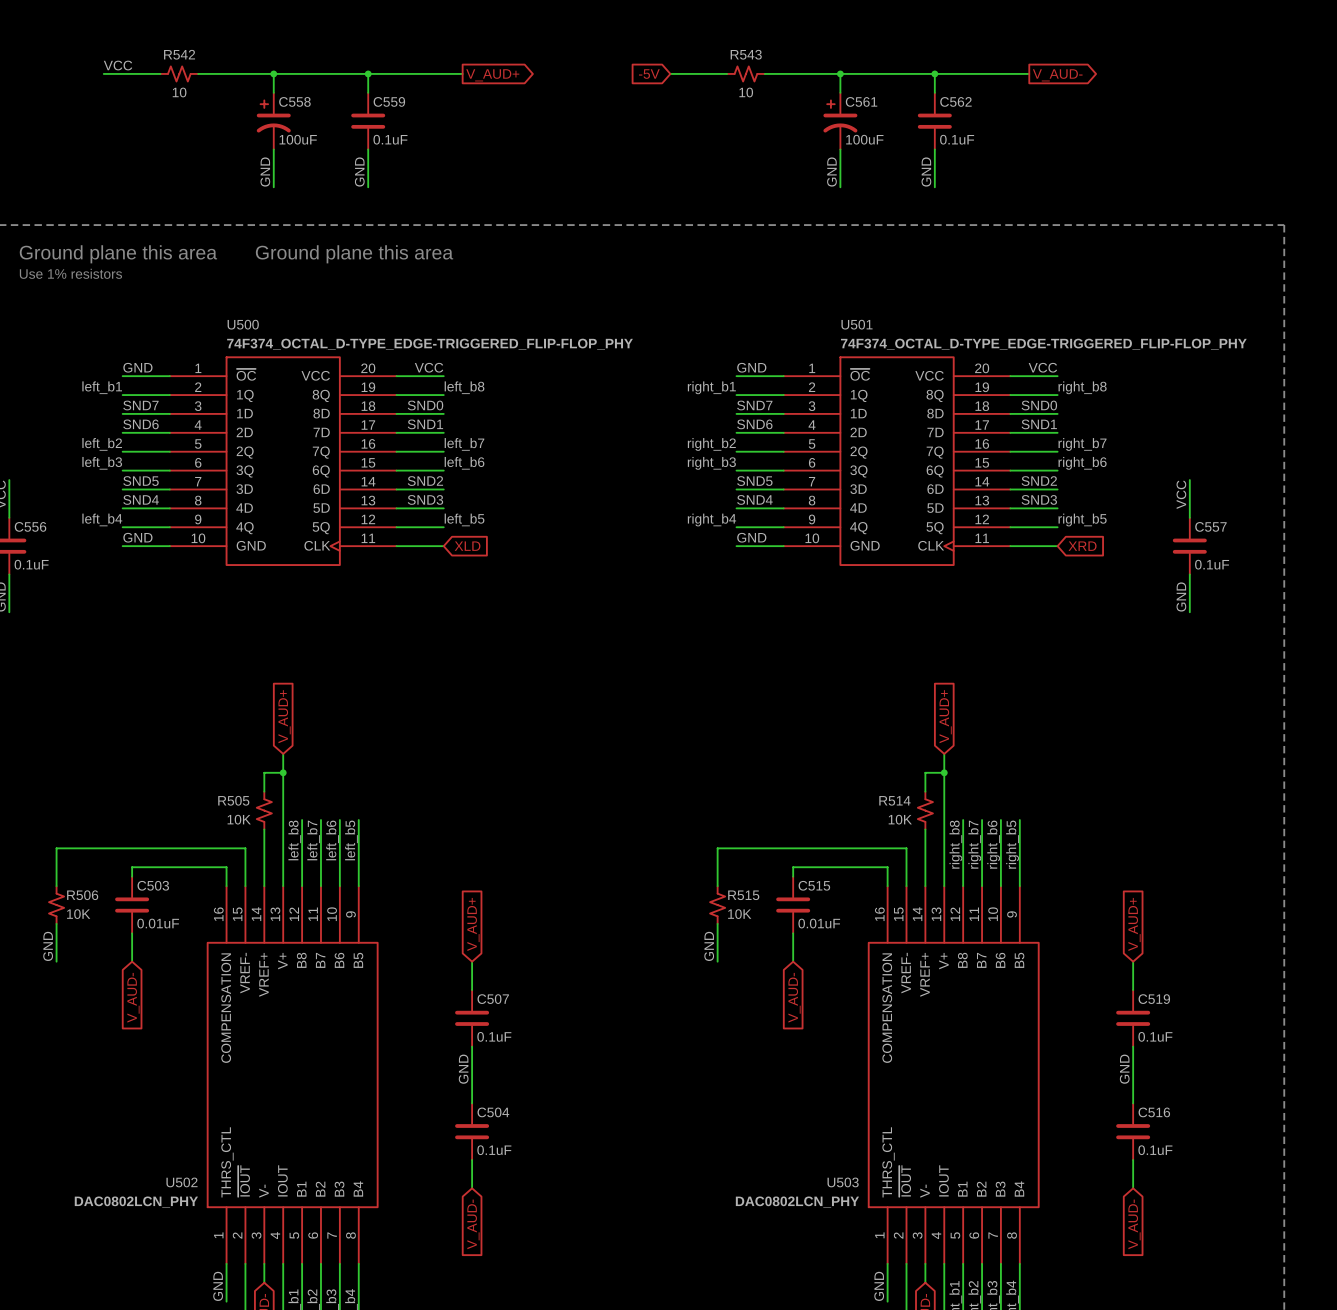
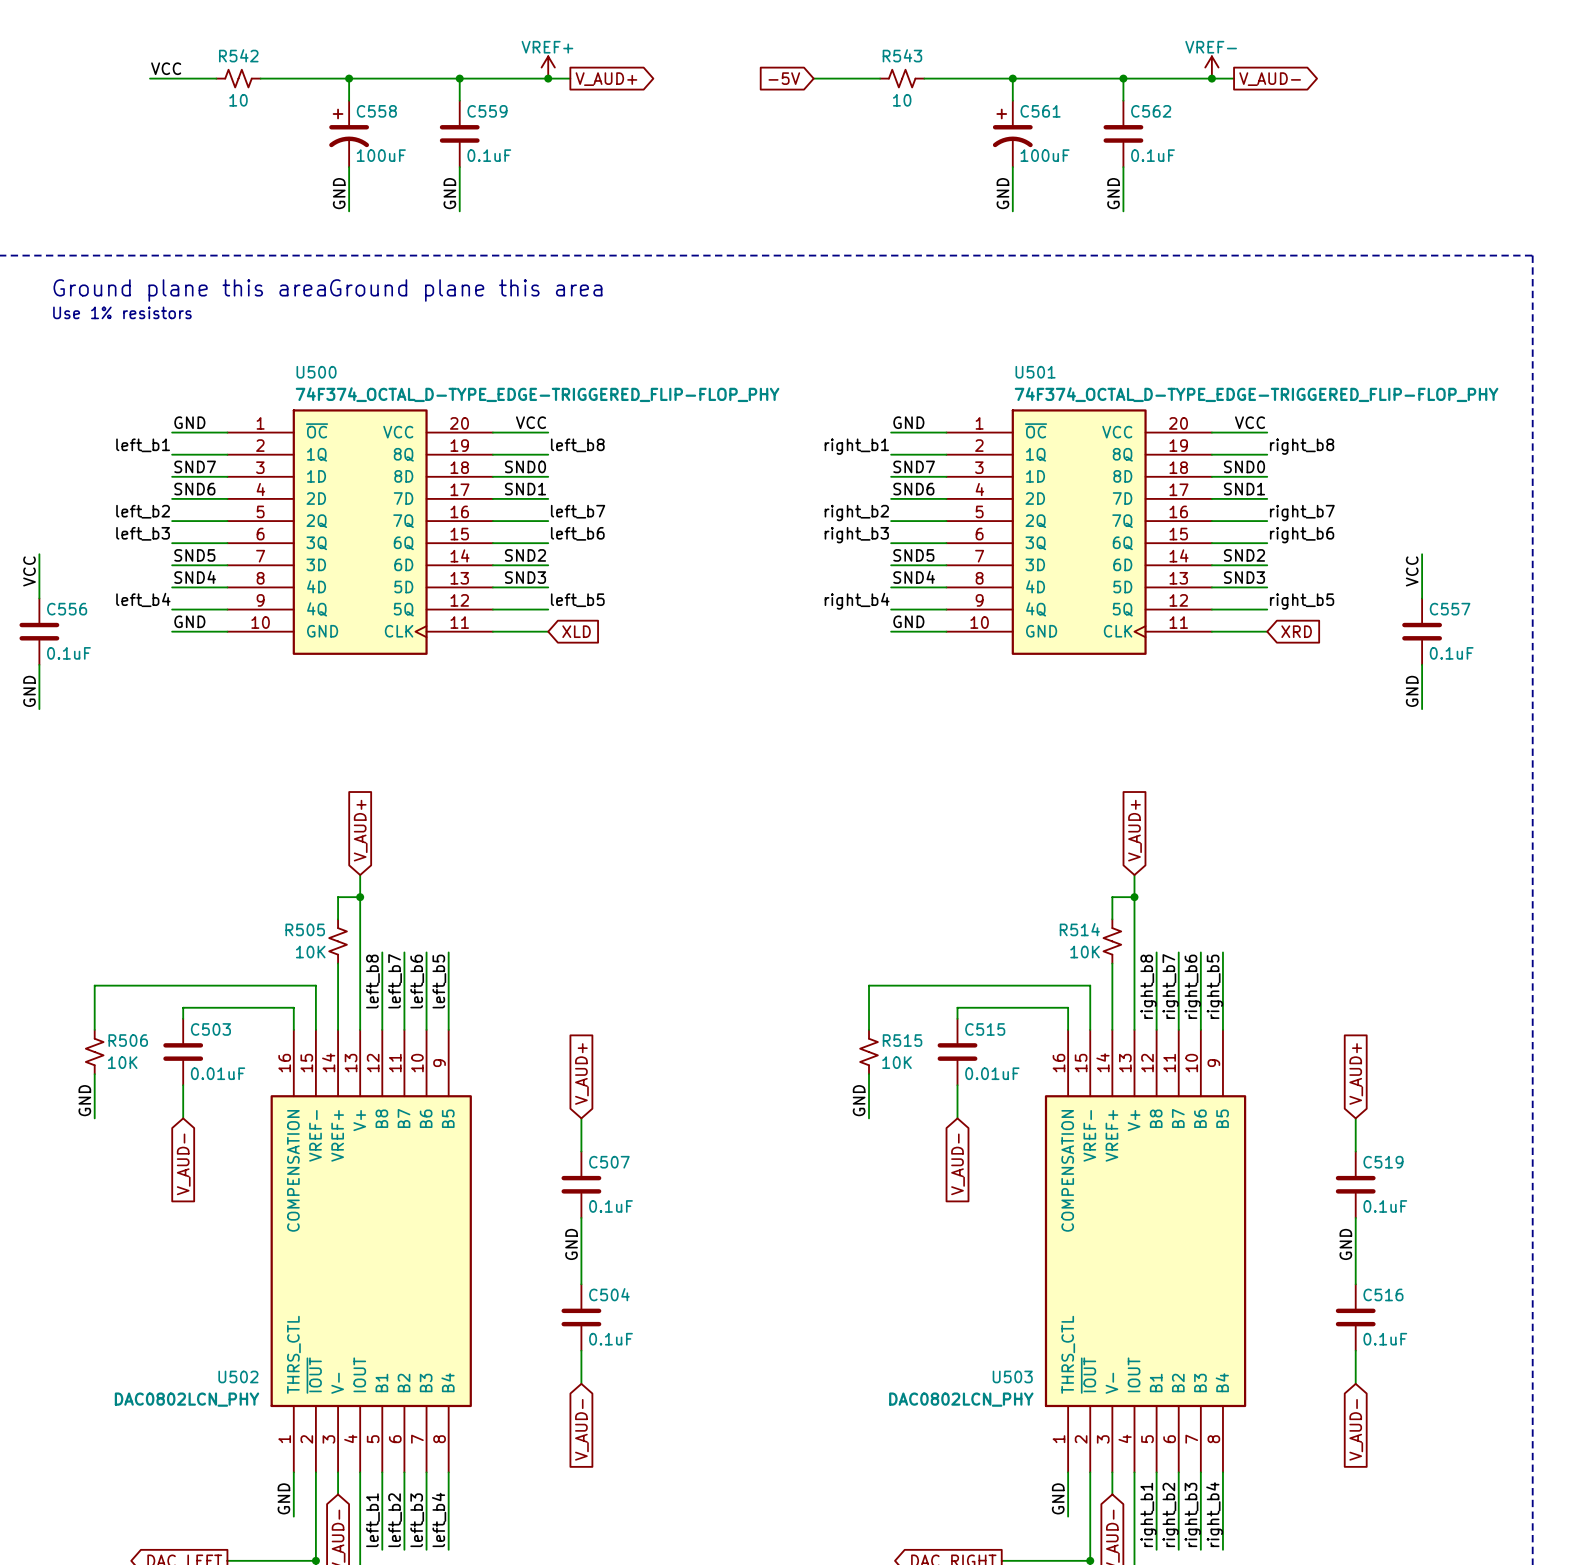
power symbol: none -> VREF+ (548, 67)
power symbol: none -> VREF- (1211, 67)
junction: none -> (548, 78)
junction: none -> (1211, 78)

